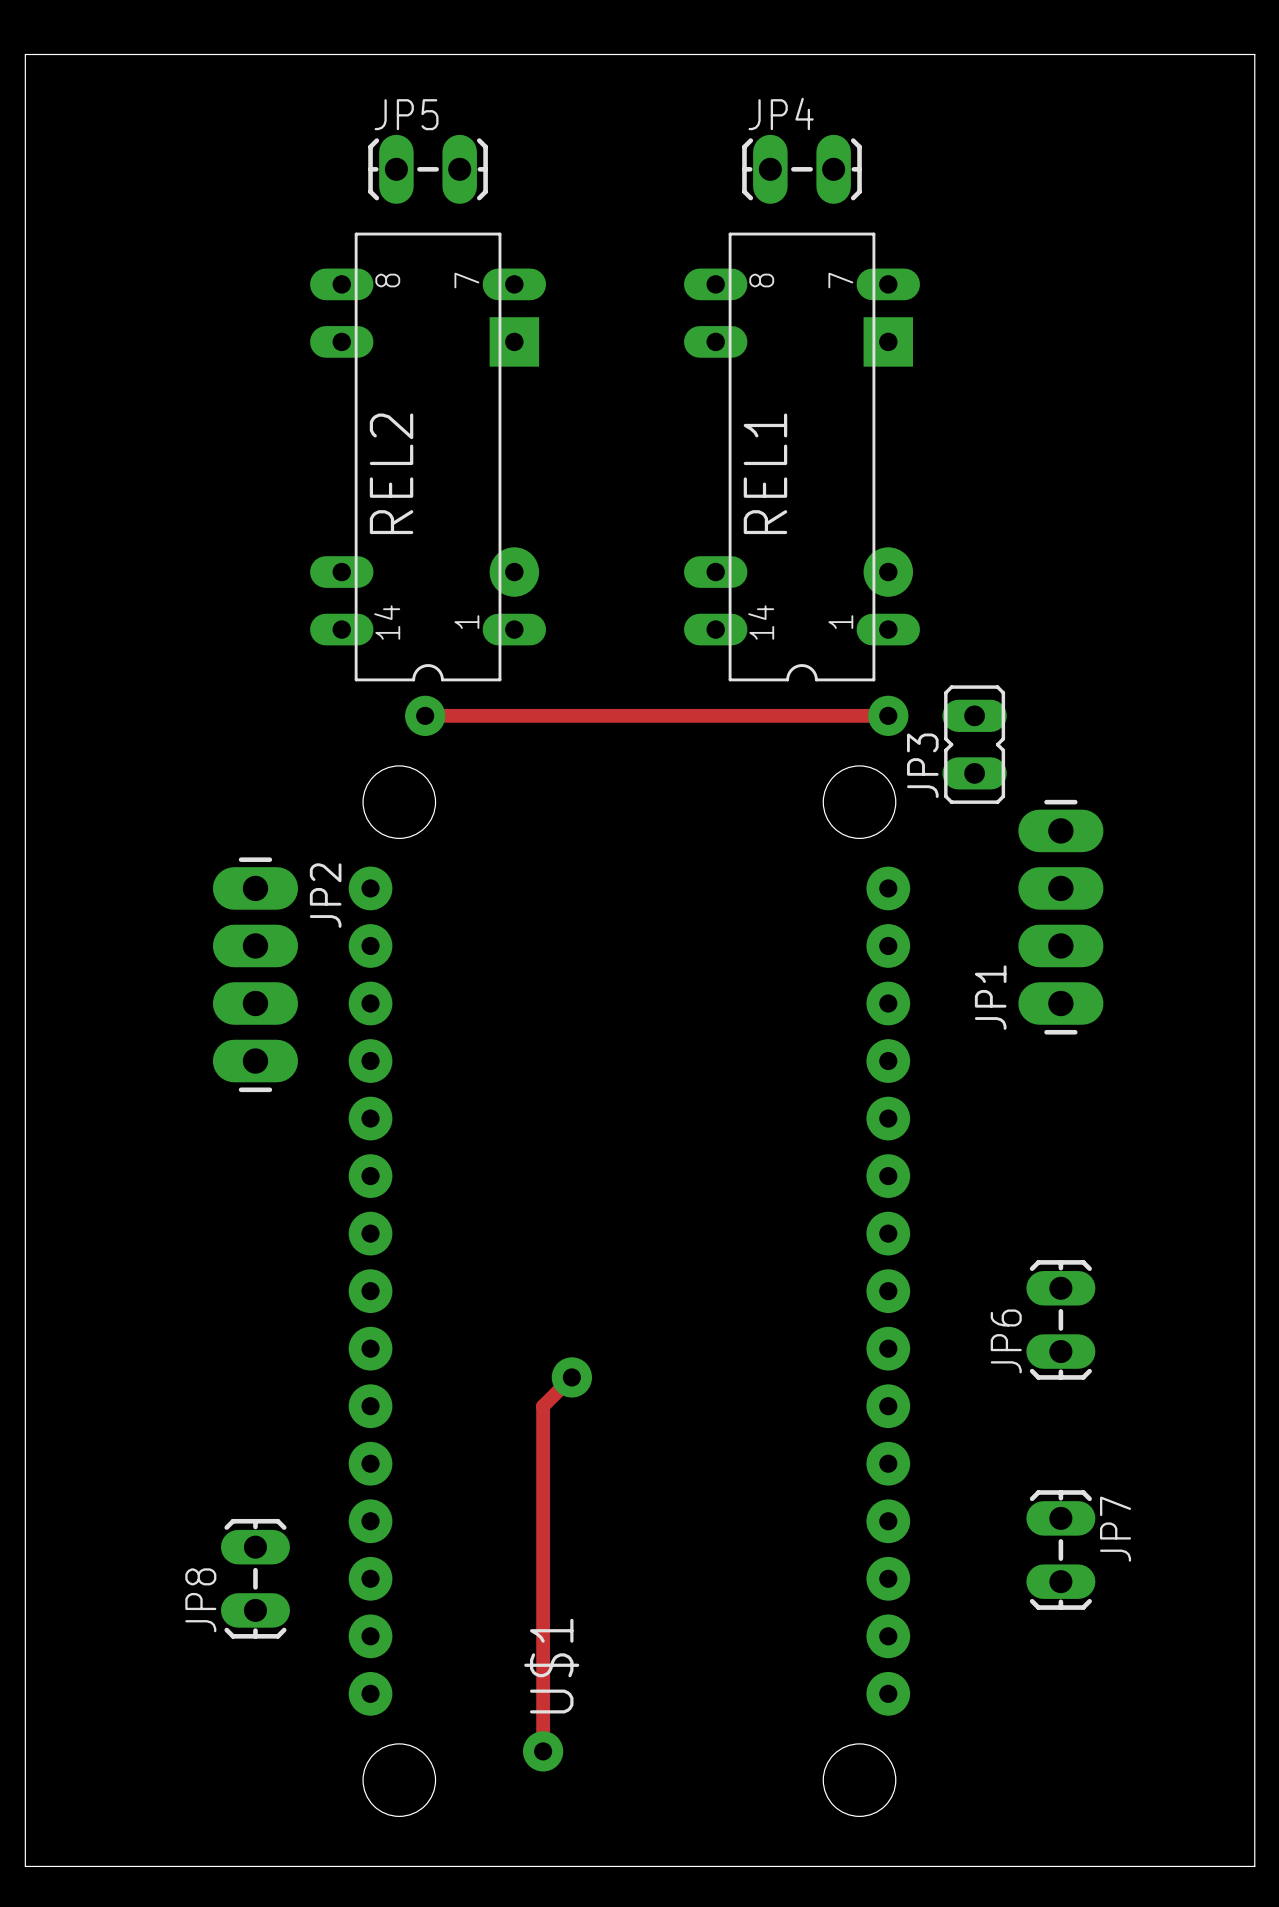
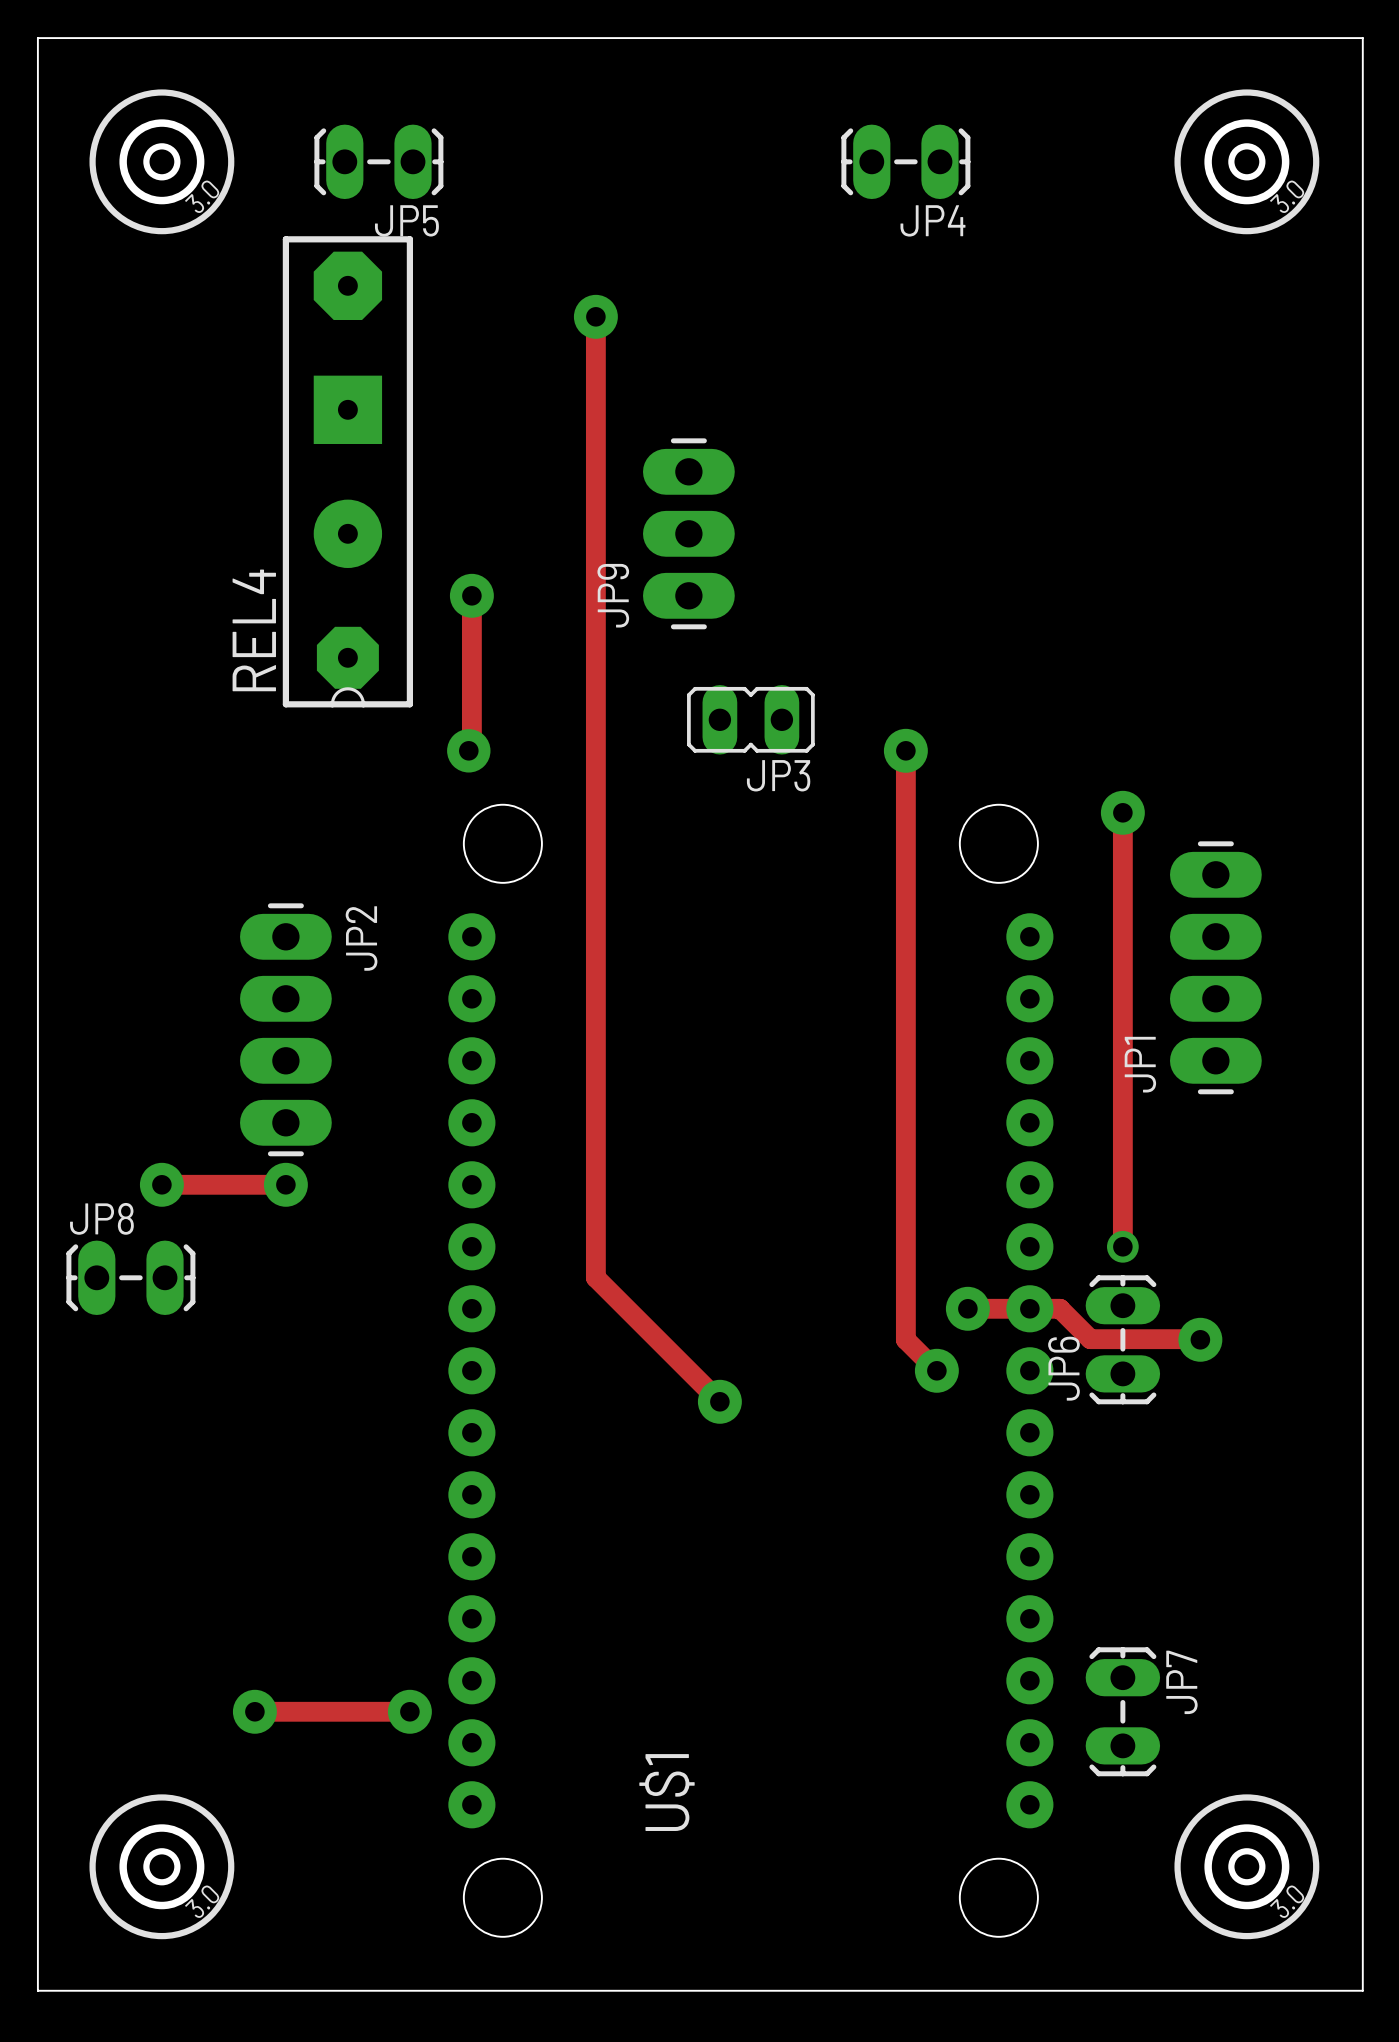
JP4 name position: JP4 (781, 113) -> JP4 (932, 220)
JP5 name position: JP5 (406, 114) -> JP5 (406, 220)
part: none -> (161, 161)
JP5 position: (428, 169) -> (378, 161)
JP4 position: (802, 169) -> (905, 161)
part: none -> (1246, 161)
track: none -> (595, 316) (595, 1277) (719, 1401)
via: none -> (595, 316)
REL4: none -> (347, 471)
REL2: (428, 456) -> none
REL1: (802, 456) -> none
JP9: none -> (688, 533)
track: none -> (471, 595) (471, 750)
via: none -> (471, 595)
track: (425, 715) (888, 715) -> none
track: none -> (905, 750) (905, 1339) (936, 1370)
via: none -> (905, 750)
via: (888, 715) -> none
JP3 rotation: 0° (974, 744) -> 90° clockwise (750, 719)
JP3 position: (974, 744) -> (750, 719)
JP3 name position: JP3 (922, 765) -> JP3 (778, 775)
track: none -> (1122, 812) (1122, 1246)
via: none -> (1122, 812)
JP1 position: (1060, 917) -> (1215, 967)
track: none -> (161, 1184) (285, 1184)
via: none -> (161, 1184)
via: none -> (285, 1184)
via: none -> (1122, 1246)
track: none -> (967, 1308) (1060, 1308) (1090, 1339) (1200, 1339)
via: none -> (967, 1308)
via: none -> (1200, 1339)
U$1 position: (629, 1291) -> (750, 1370)
via: none -> (936, 1370)
via: none -> (719, 1401)
JP6 position: (1060, 1319) -> (1122, 1339)
track: (571, 1377) (543, 1406) (543, 1751) -> none
via: (571, 1377) -> none
JP7 position: (1060, 1550) -> (1122, 1711)
JP8 rotation: 0° (255, 1578) -> 90° clockwise (130, 1277)
JP8 position: (255, 1578) -> (130, 1277)
track: none -> (254, 1711) (409, 1711)
via: none -> (254, 1711)
via: none -> (409, 1711)
part: none -> (161, 1866)
via: (543, 1751) -> none
part: none -> (1246, 1866)

